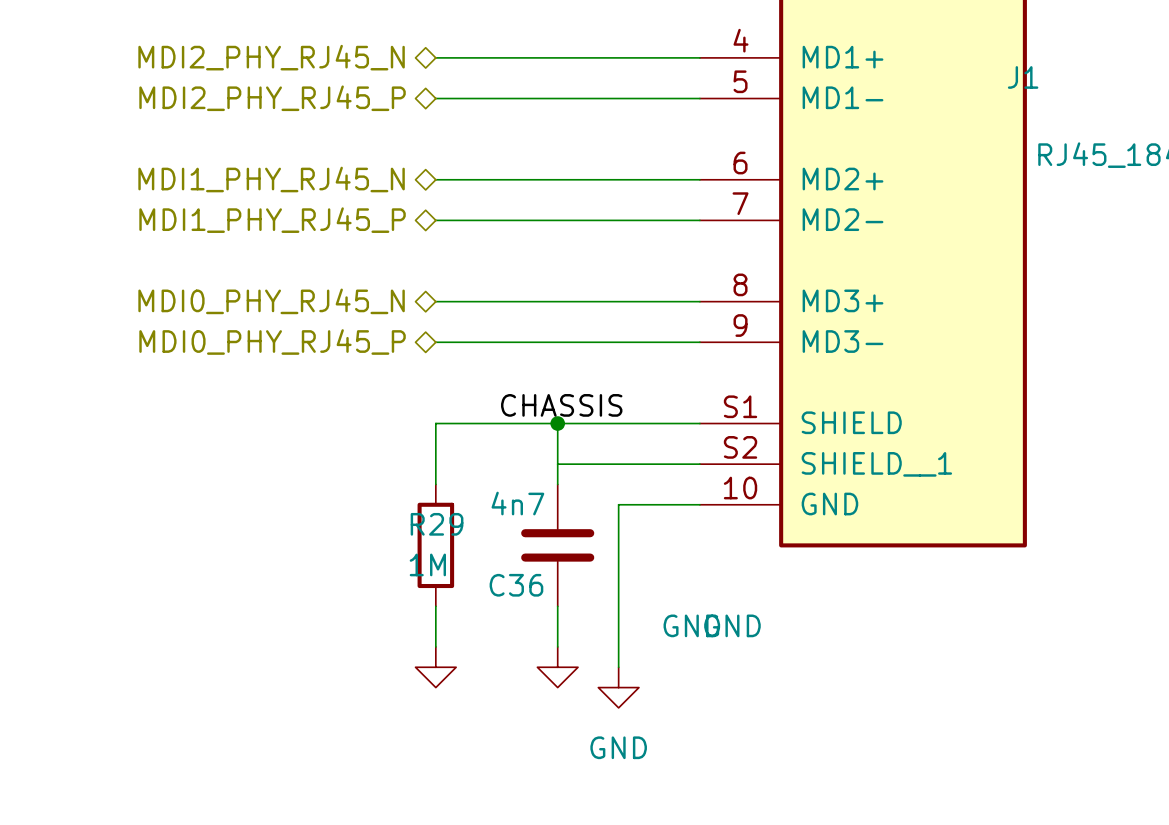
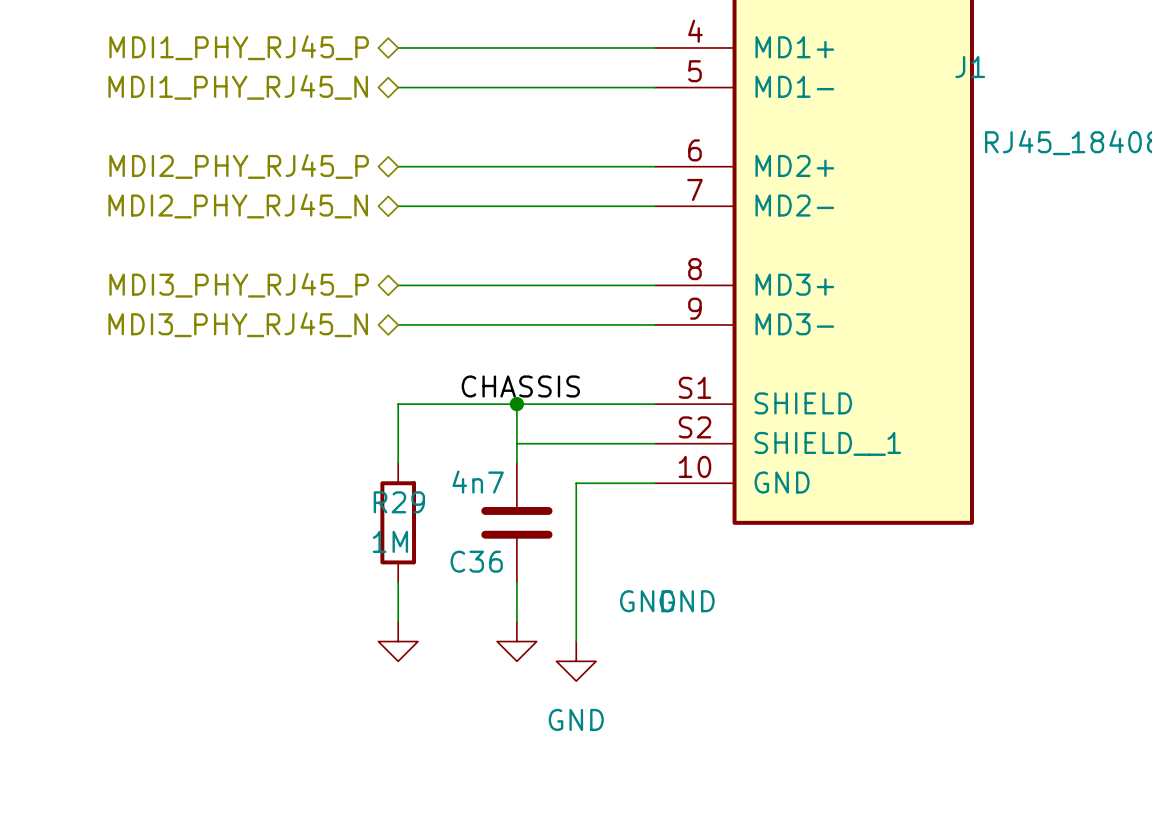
hierarchical label: MDI2_PHY_RJ45_N (271, 57) -> MDI1_PHY_RJ45_P (239, 47)
hierarchical label: MDI2_PHY_RJ45_P (272, 98) -> MDI1_PHY_RJ45_N (238, 87)
hierarchical label: MDI1_PHY_RJ45_N (271, 179) -> MDI2_PHY_RJ45_P (239, 166)
hierarchical label: MDI1_PHY_RJ45_P (272, 220) -> MDI2_PHY_RJ45_N (238, 206)
hierarchical label: MDI0_PHY_RJ45_N (271, 301) -> MDI3_PHY_RJ45_P (239, 285)
hierarchical label: MDI0_PHY_RJ45_P (272, 342) -> MDI3_PHY_RJ45_N (238, 324)

